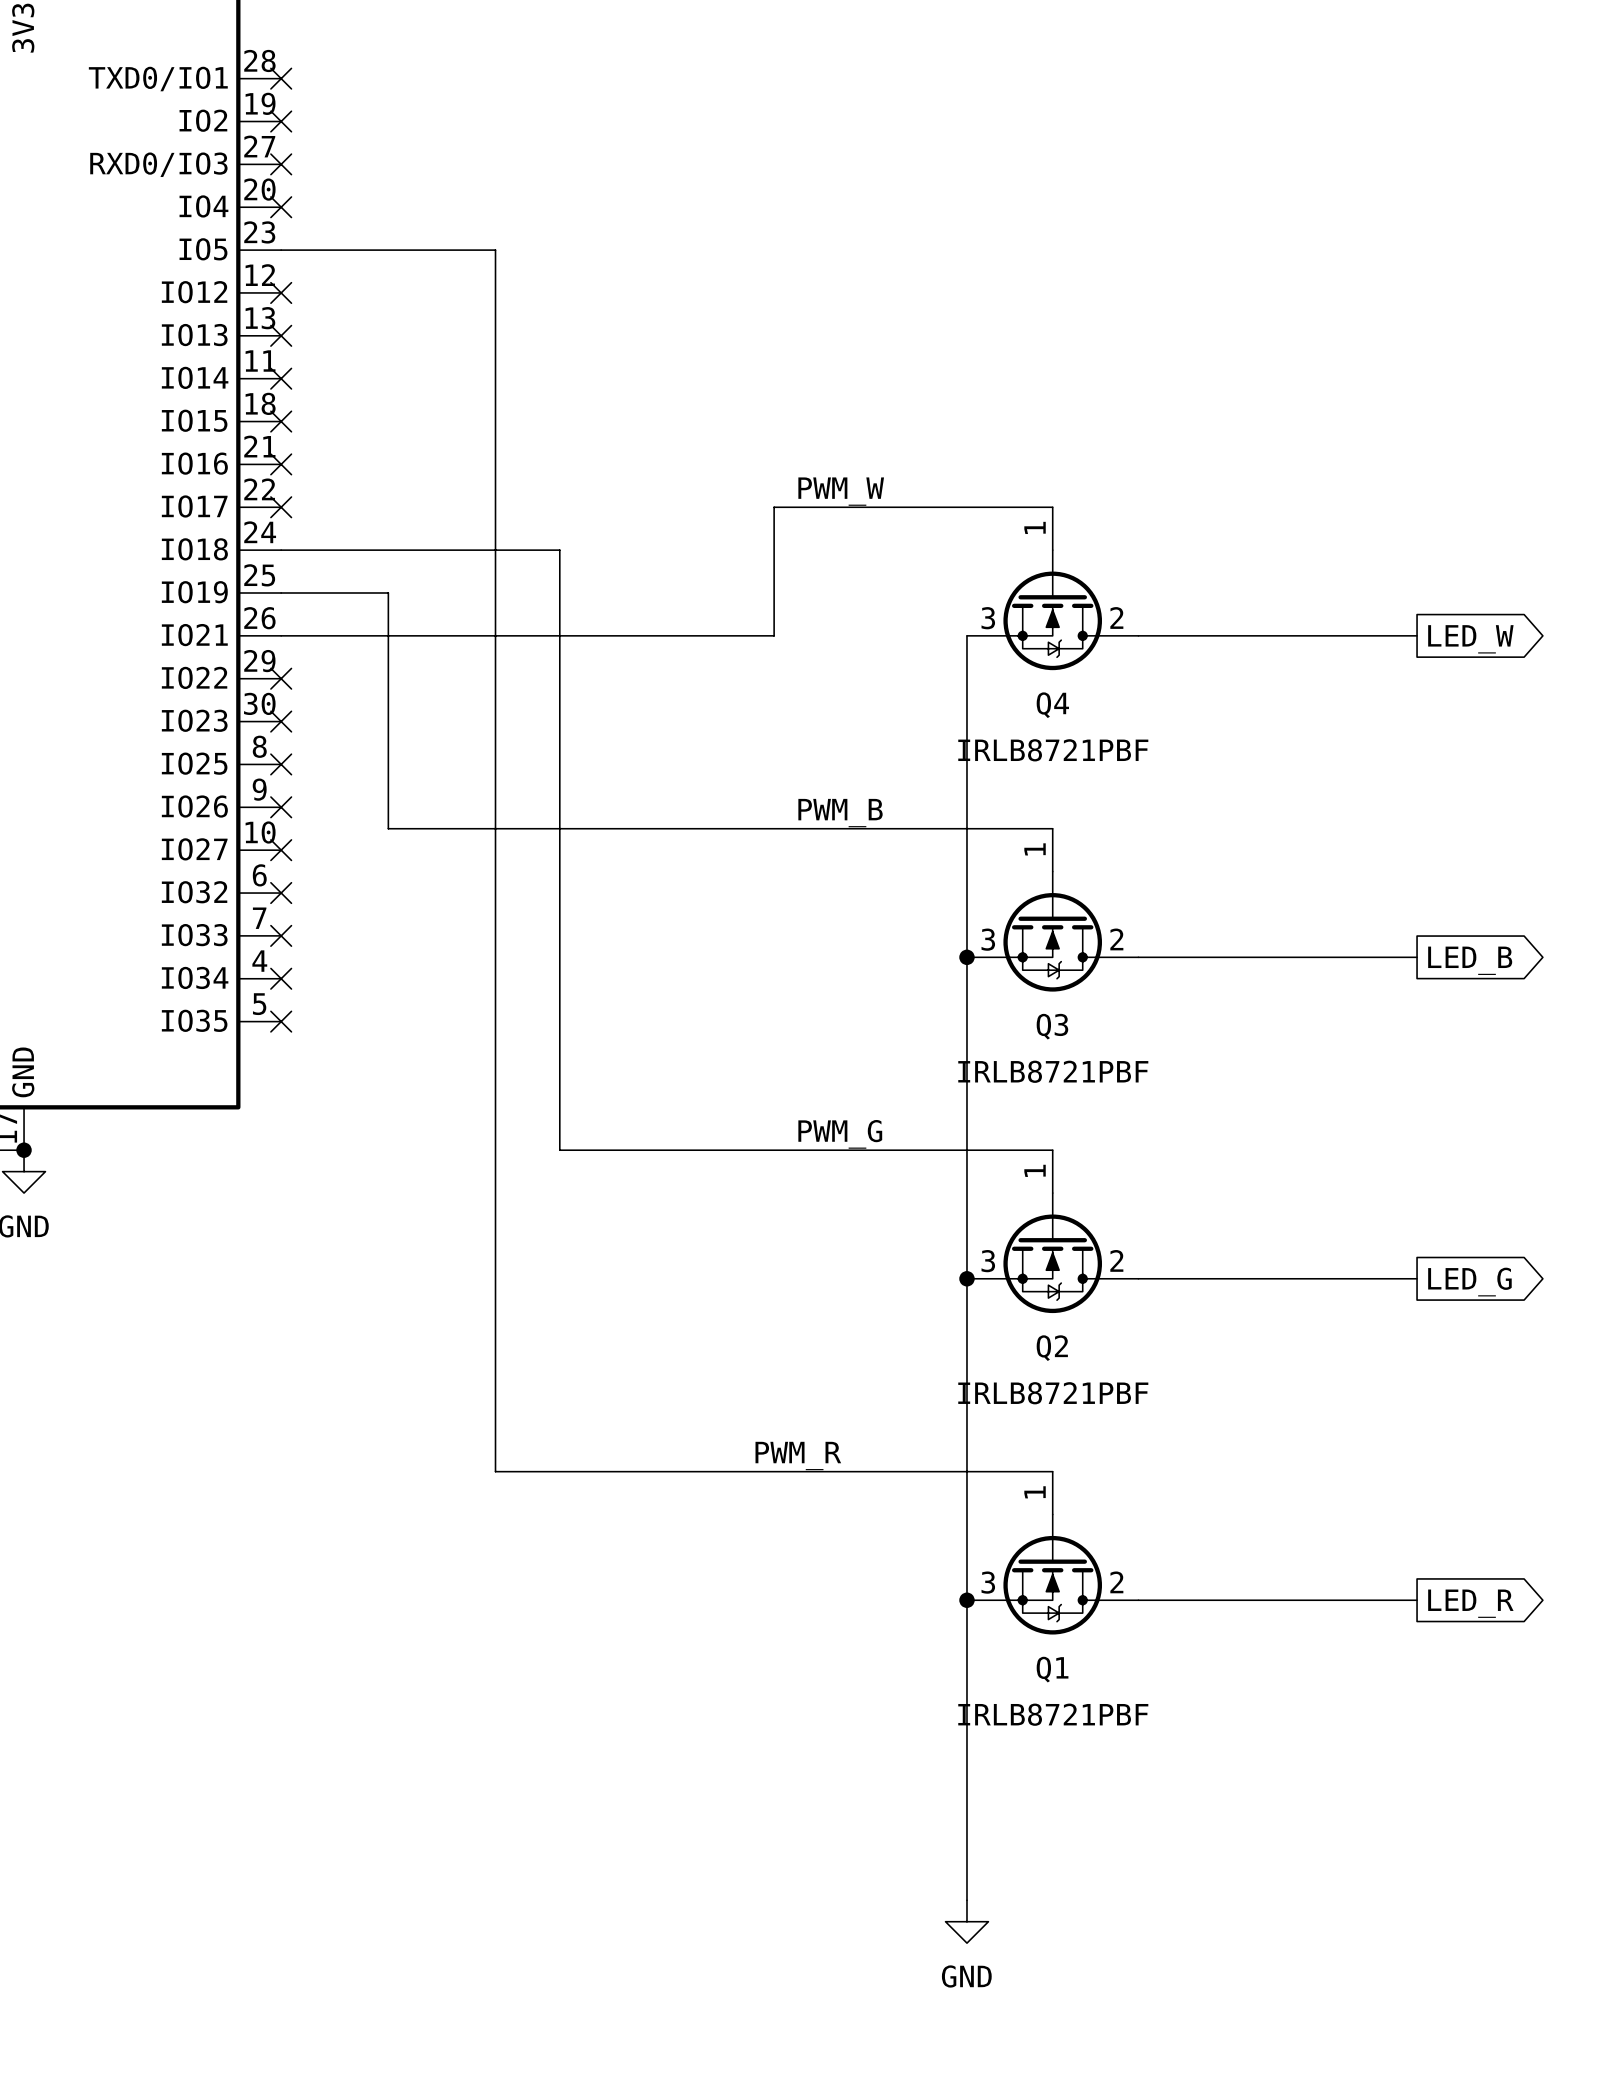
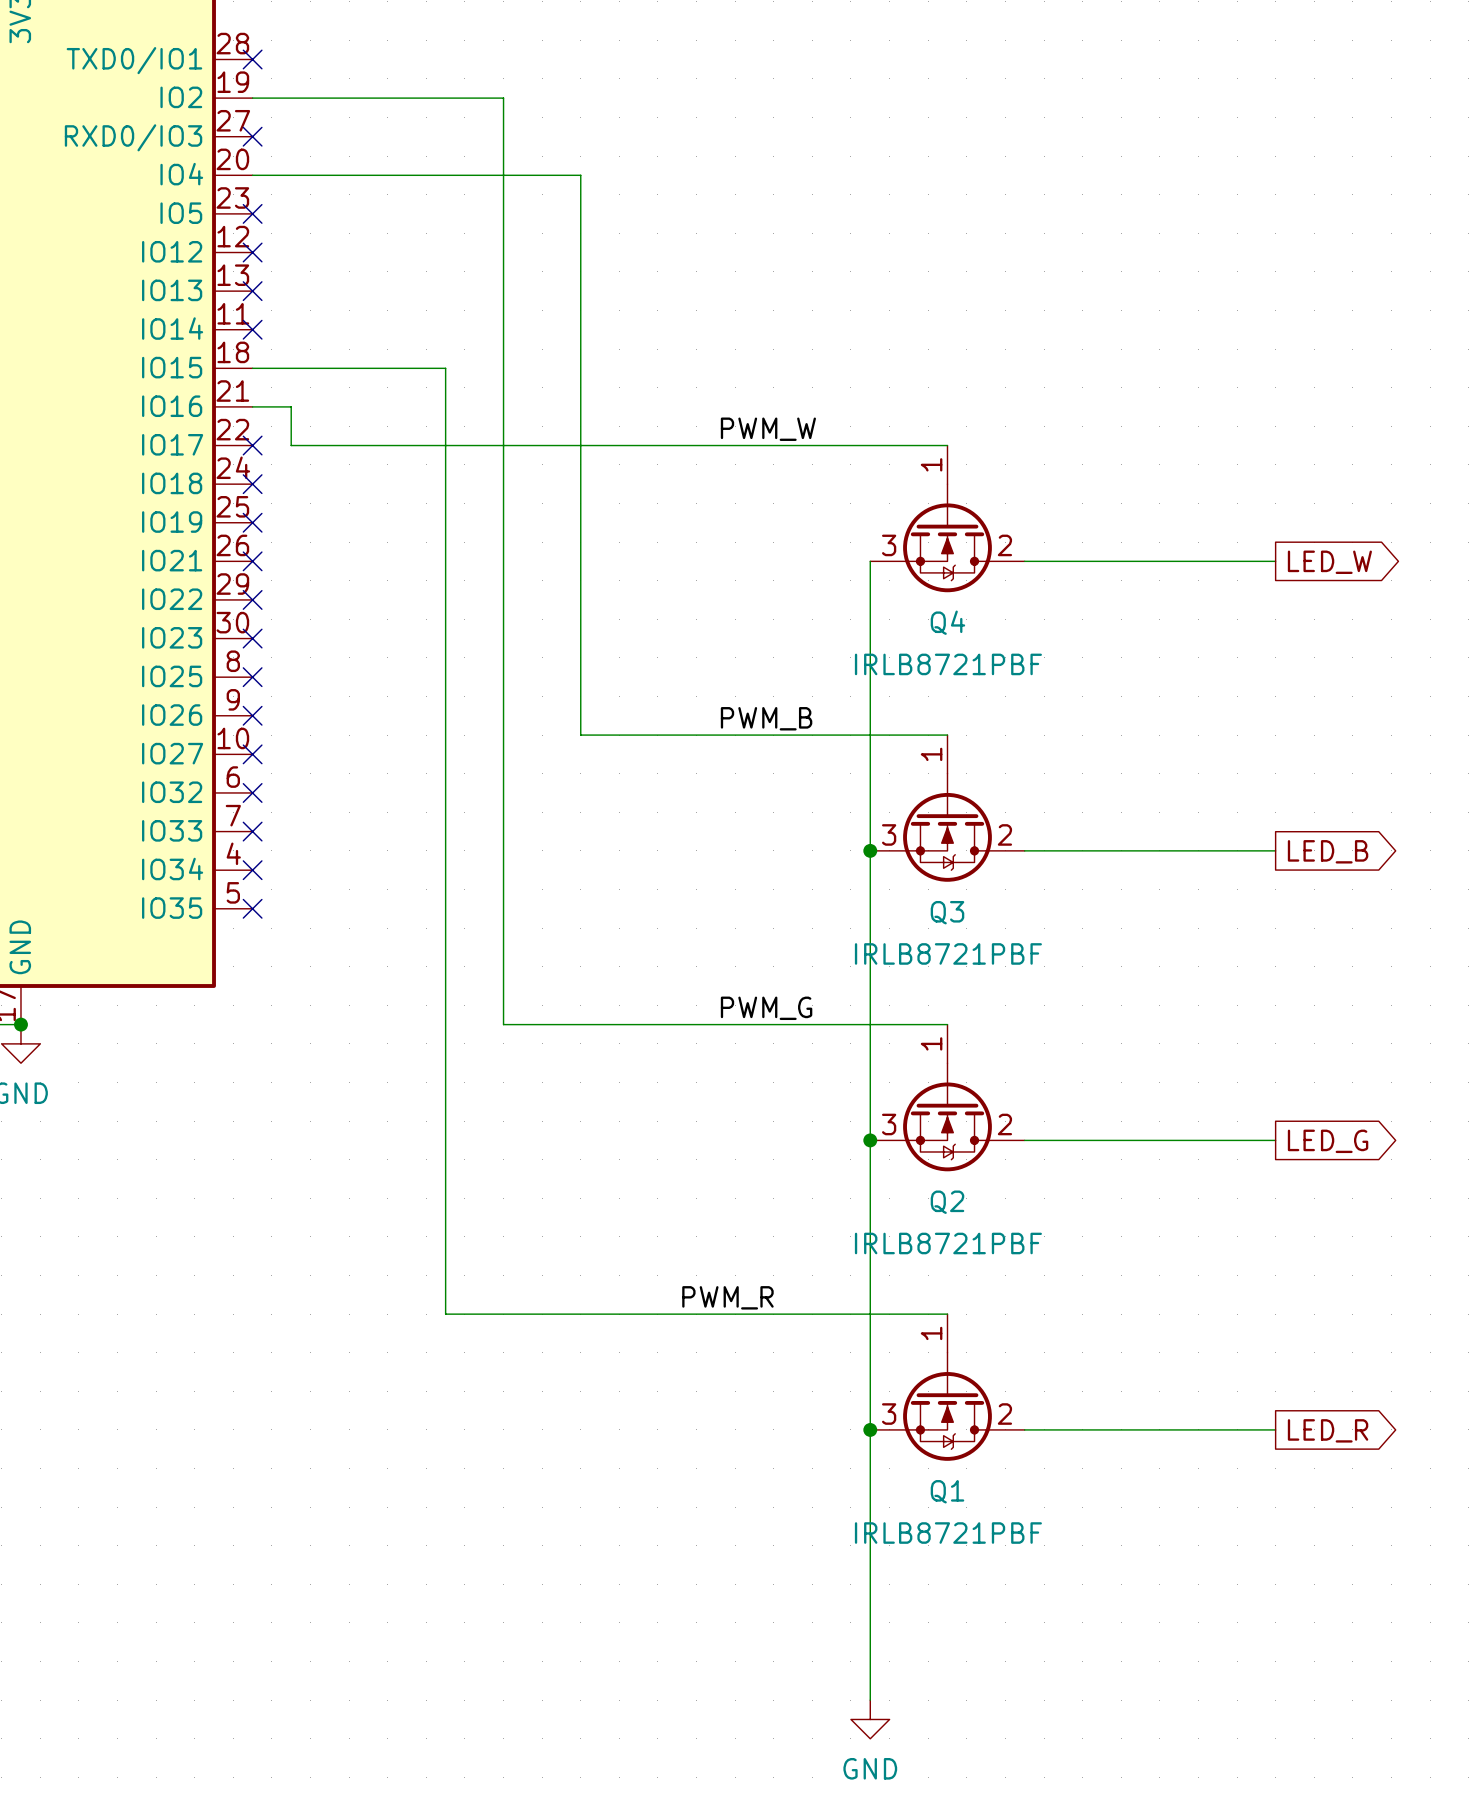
no-connect mark: (281, 121) -> none
no-connect mark position: (281, 207) -> (252, 213)
wire: (281, 250) (495, 250) (495, 421) -> (252, 368) (445, 368)
no-connect mark: (281, 421) -> none
no-connect mark: (281, 464) -> none
wire: (774, 507) (774, 635) (281, 635) -> (696, 445) (291, 445) (291, 406) (252, 406)
wire: (281, 550) (559, 550) -> (252, 98) (503, 98) (503, 484)
no-connect mark: none -> (252, 484)
wire: (281, 592) (388, 592) (388, 828) (645, 828) -> (252, 175) (580, 175) (580, 735)
no-connect mark: none -> (252, 522)
no-connect mark: none -> (252, 561)

